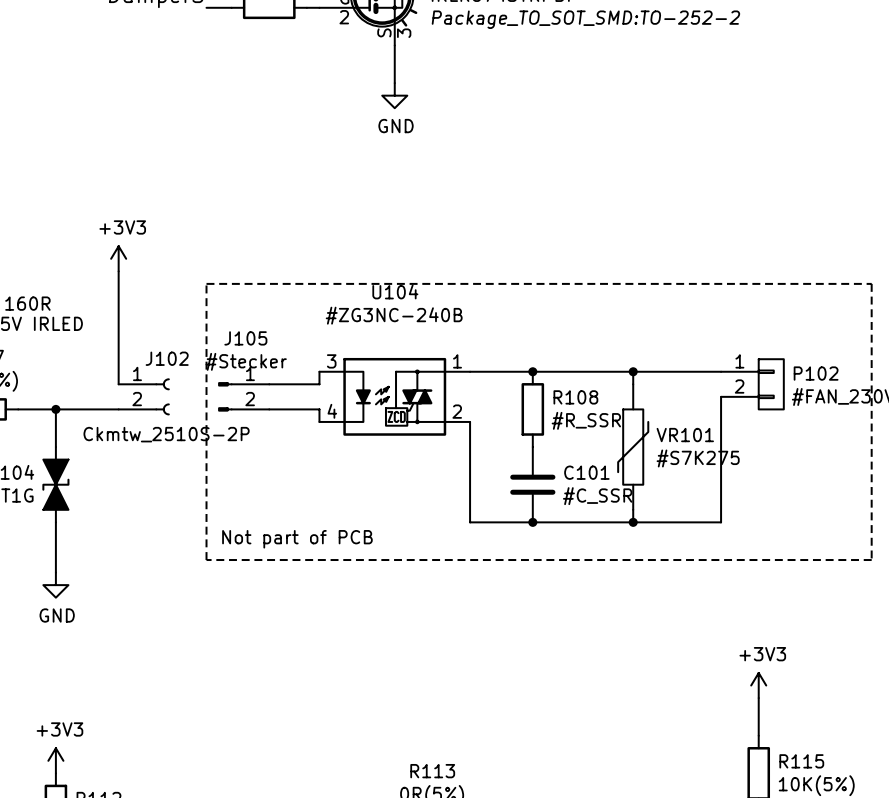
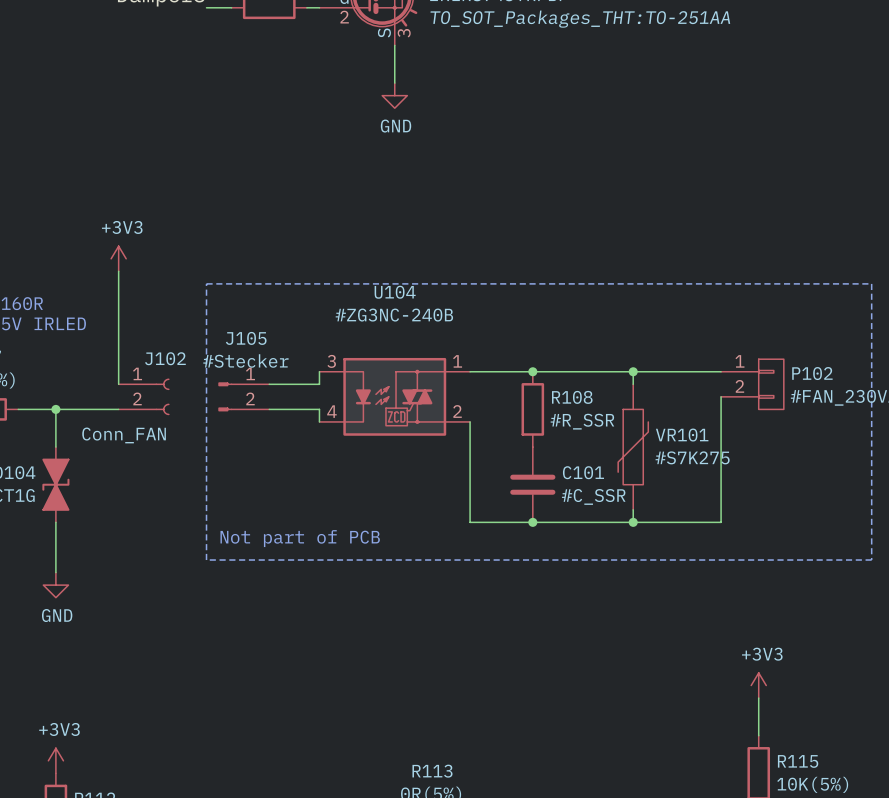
part text: Package_TO_SOT_SMD:TO-252-2 (585, 19) -> TO_SOT_Packages_THT:TO-251AA (580, 19)
J102 value: Ckmtw_2510S-2P (166, 434) -> Conn_FAN (124, 435)

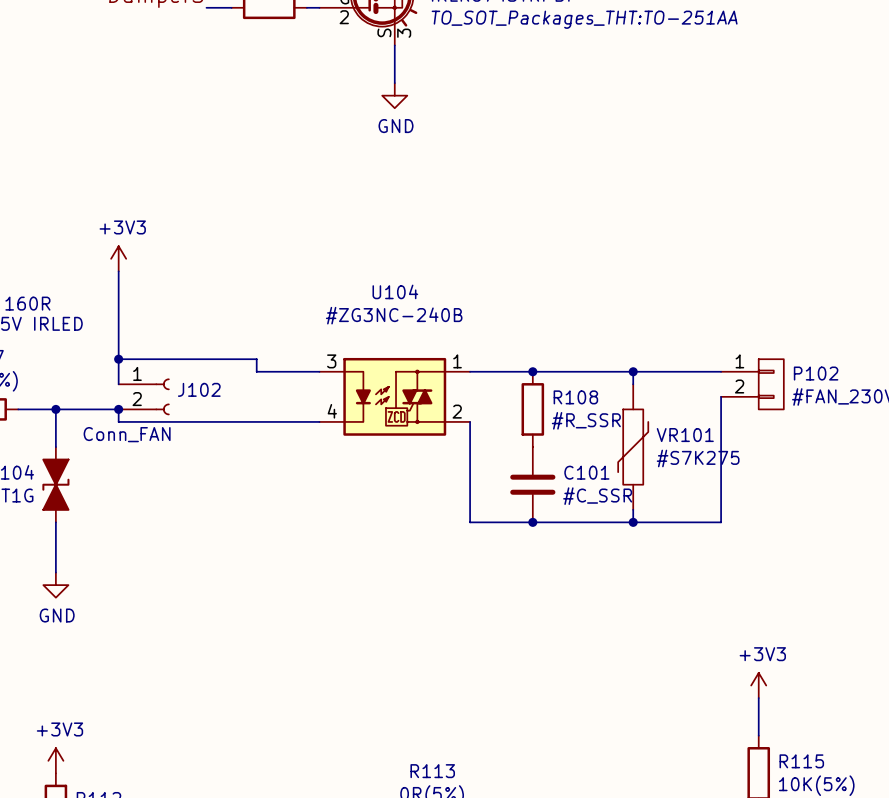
line: (206, 283) (871, 283) (871, 560) (206, 560) (206, 283) -> none
J102 name position: J102 (165, 358) -> J102 (199, 389)
junction: none -> (118, 359)
wire: (319, 371) (319, 384) (269, 384) -> (319, 371) (256, 371) (256, 359) (118, 359)
J105: #Stecker (243, 396) -> none
junction: none -> (118, 409)
wire: (269, 409) (319, 409) (319, 421) -> (118, 409) (118, 421) (319, 421)
text: Not part of PCB (300, 538) -> none

